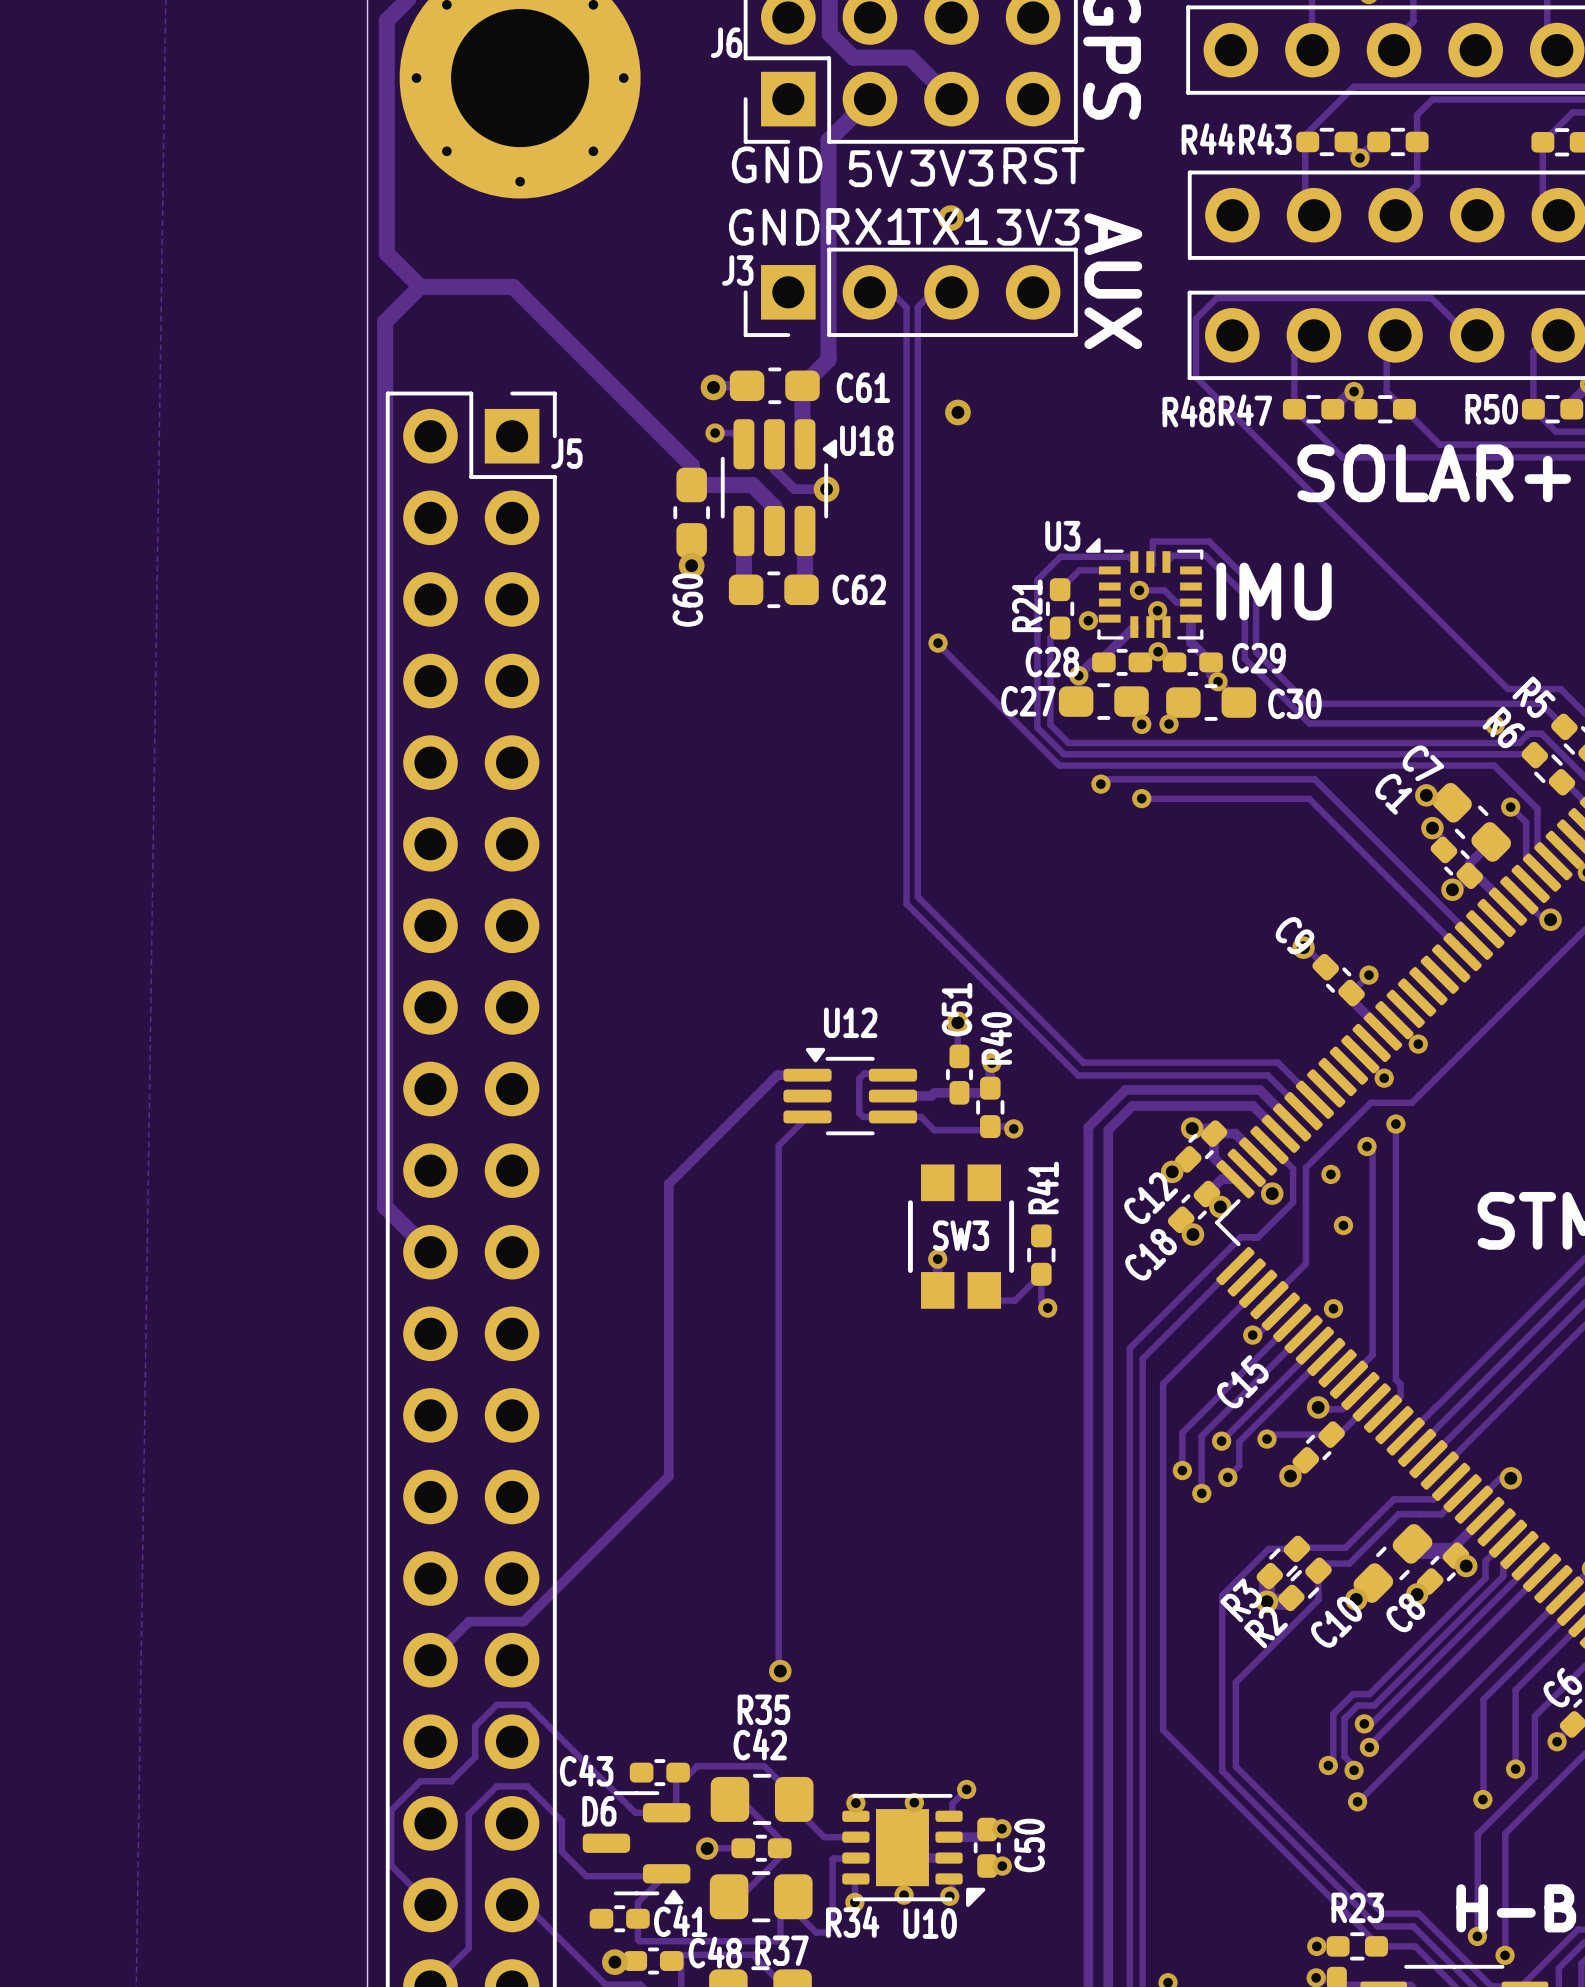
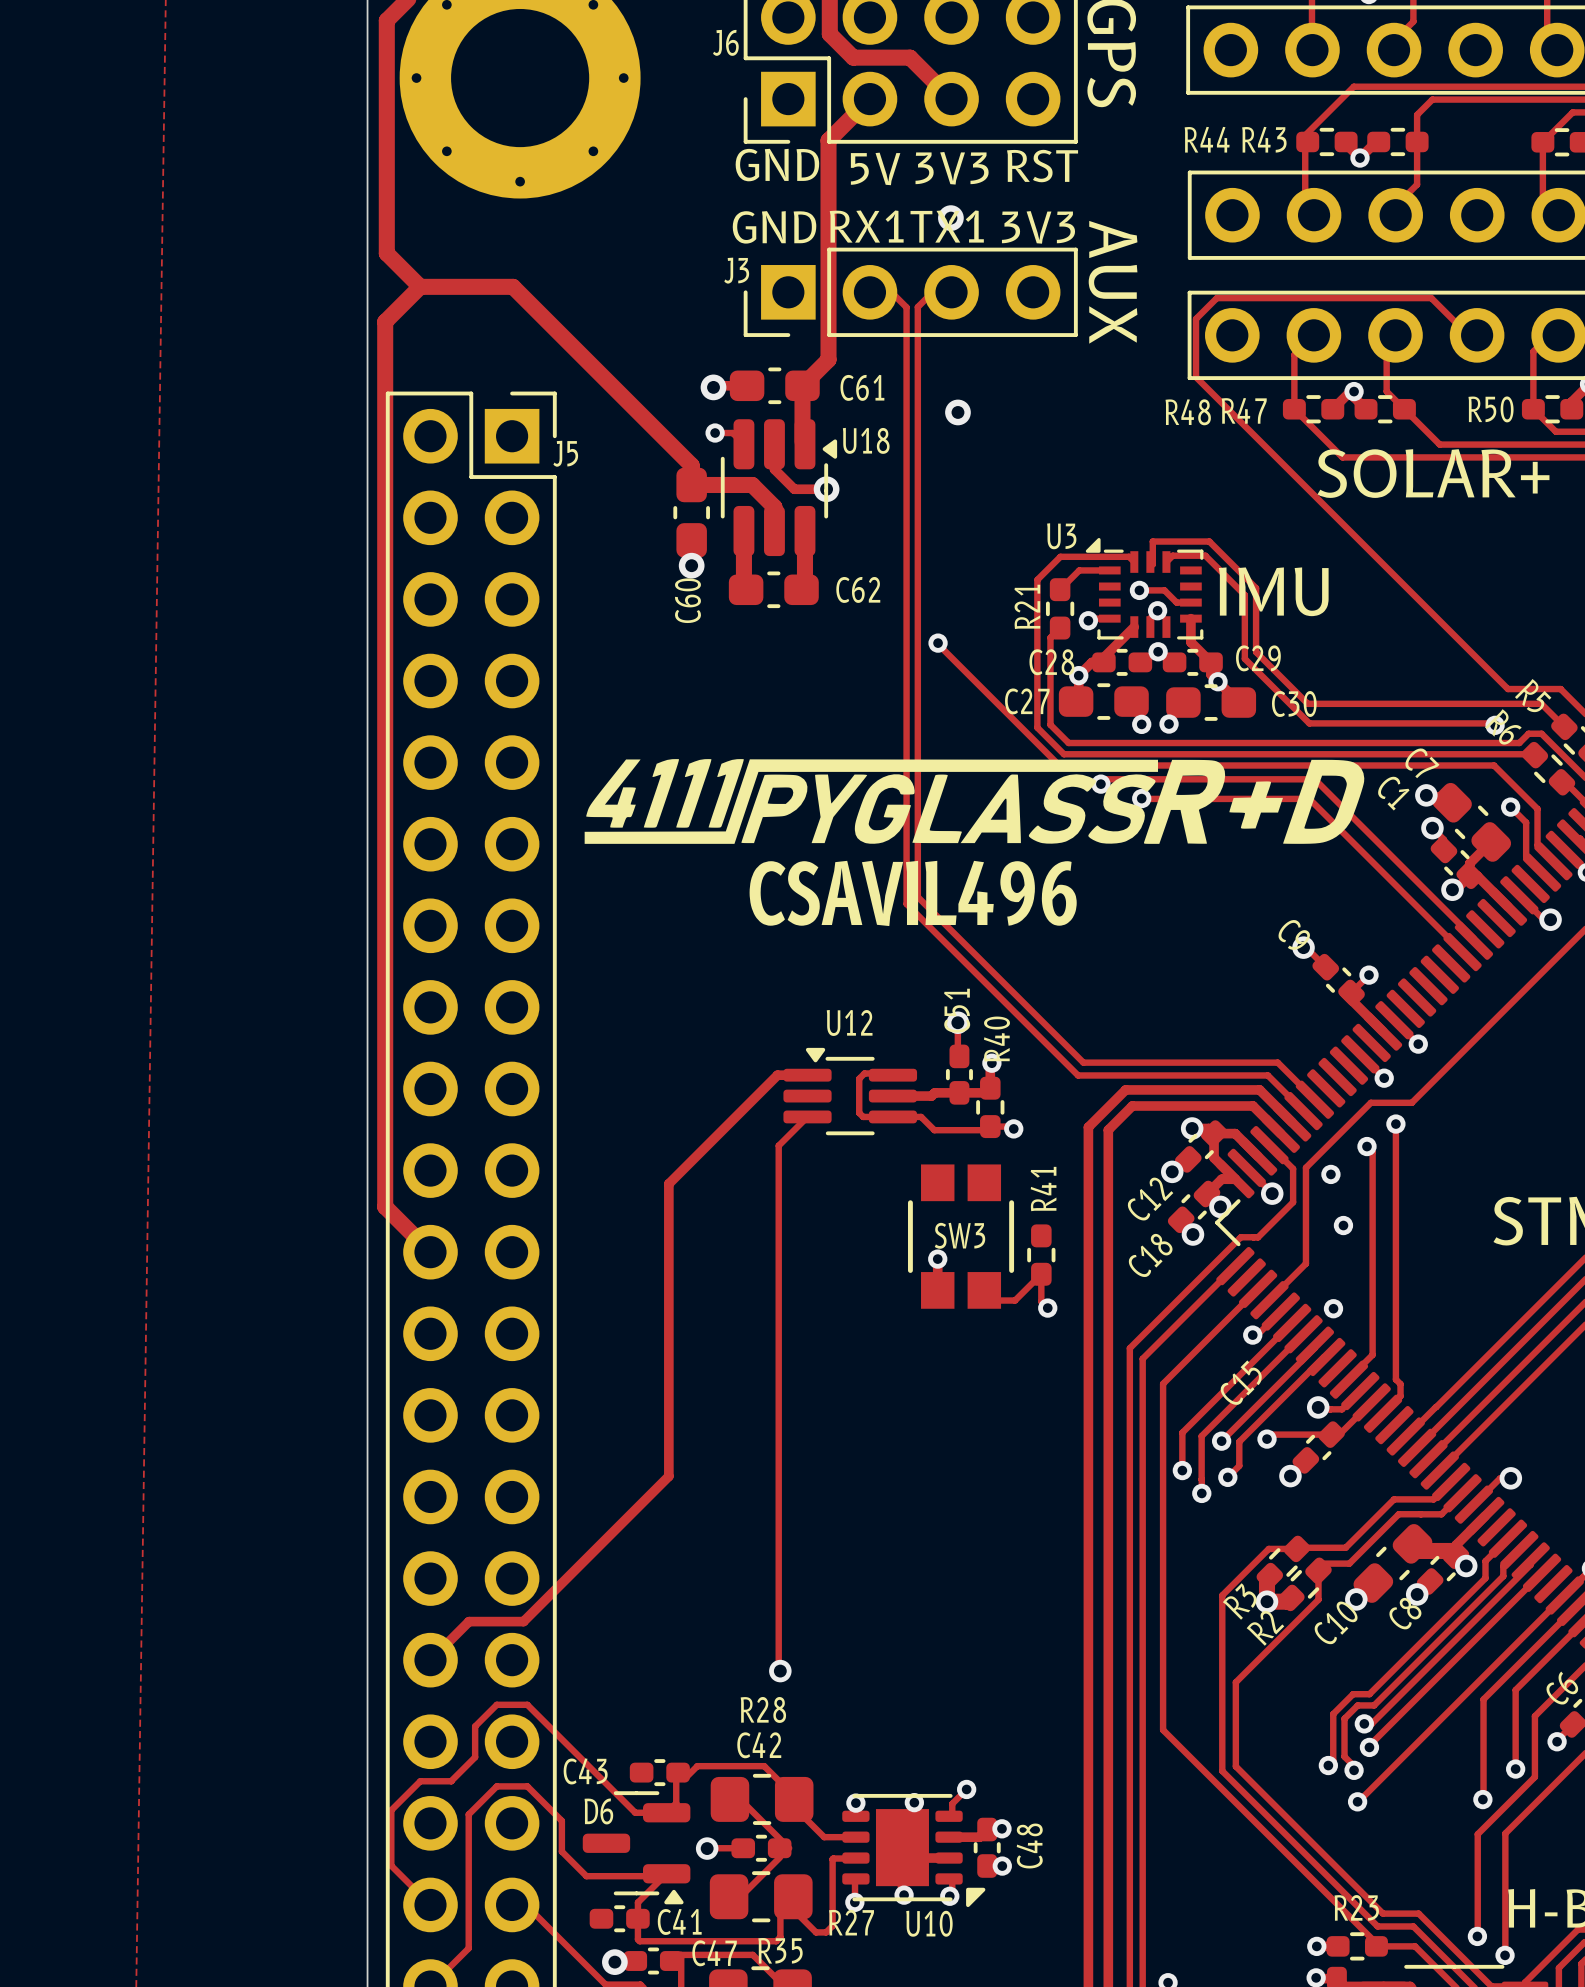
drawing: none -> [584, 759, 1365, 844]
text: none -> CSAVIL496 (913, 893)
R35 name: R35 (763, 1709) -> R28 (763, 1709)
C50 name: C50 (1029, 1845) -> C48 (1029, 1846)
R34 name: R34 (852, 1922) -> R27 (851, 1922)
R37 name: R37 (782, 1950) -> R35 (780, 1950)
C48 name: C48 (715, 1952) -> C47 (714, 1953)

